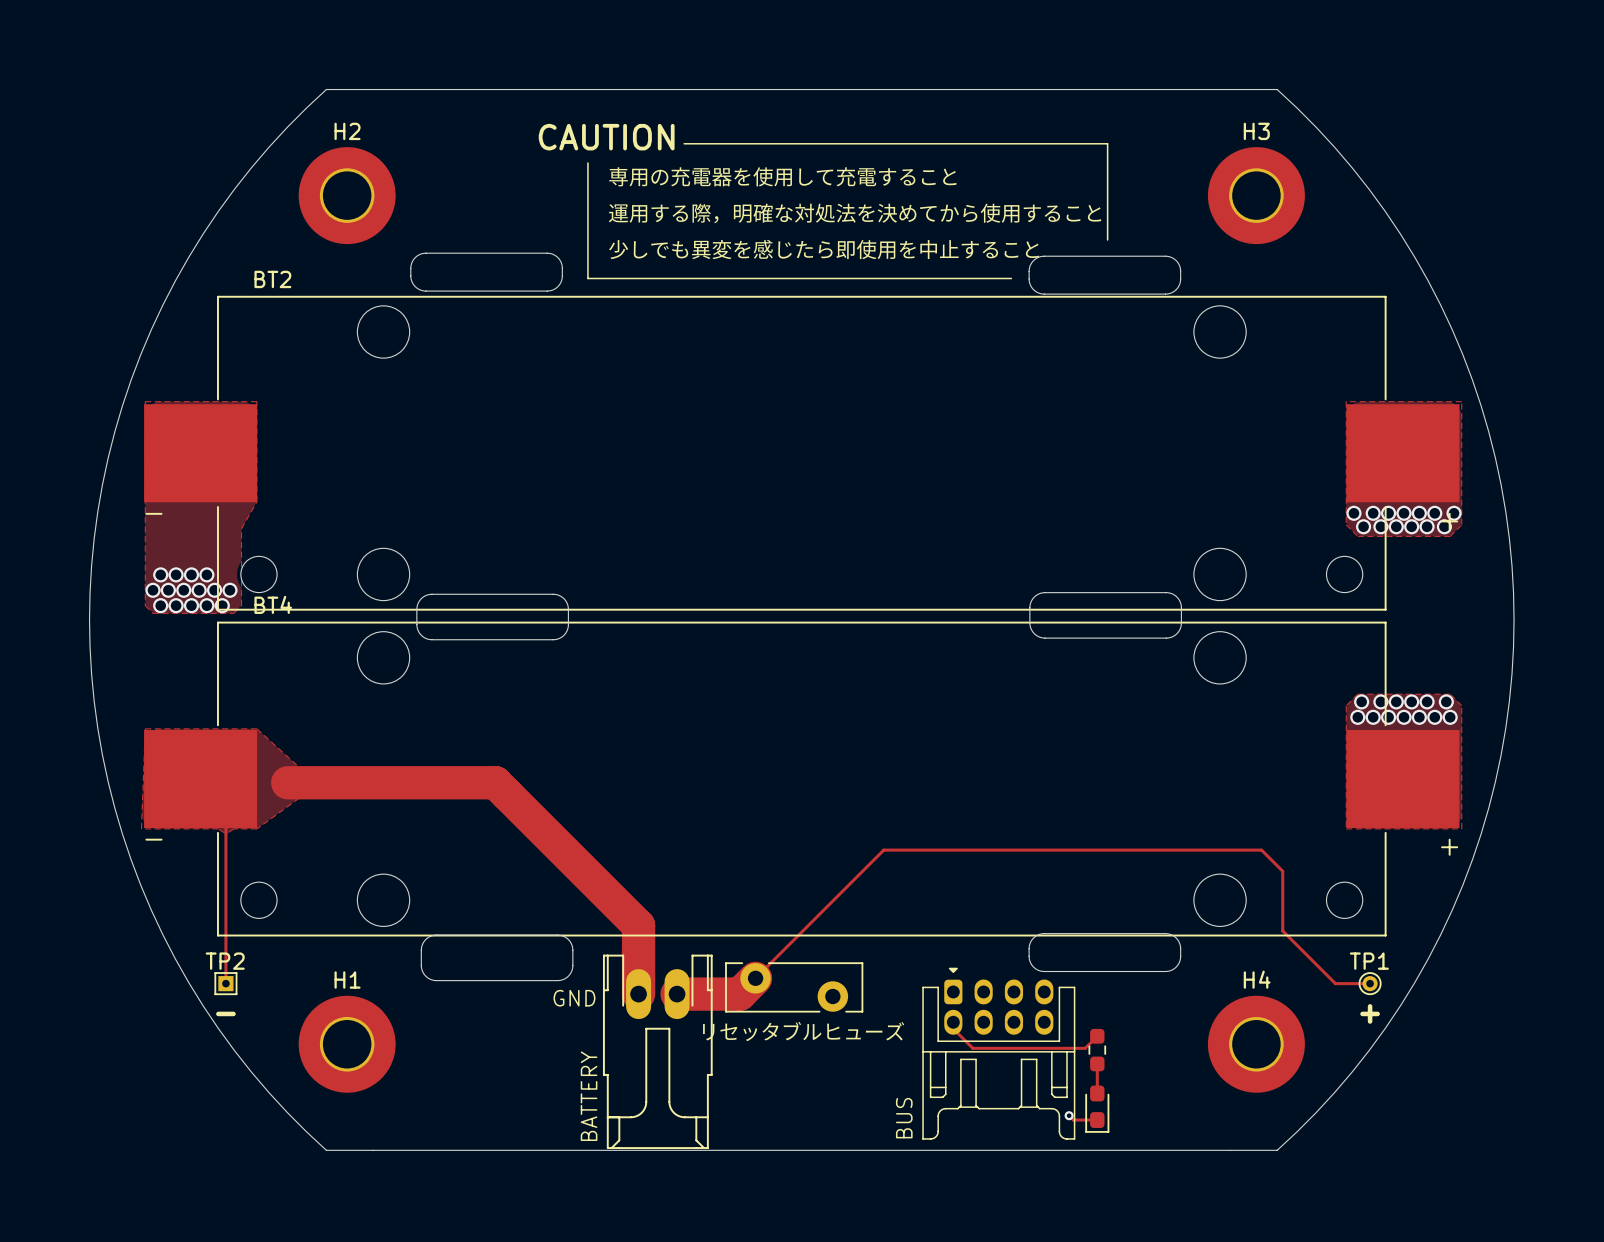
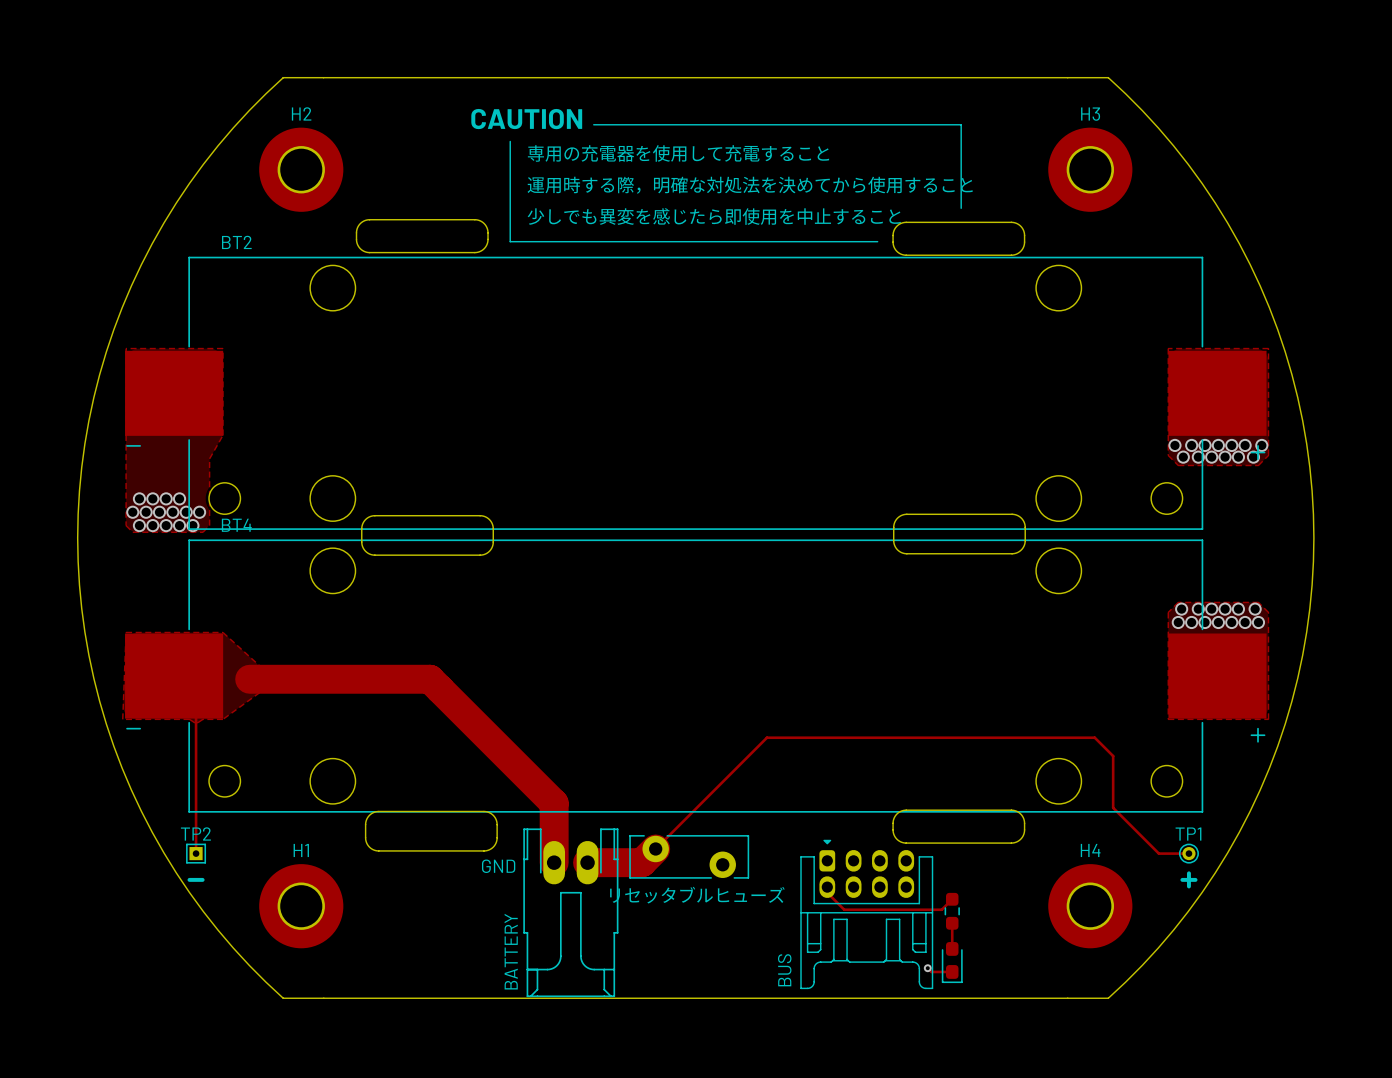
text: 運用する際，明確な対処法を決めてから使用すること (855, 213) -> 運用時する際，明確な対処法を決めてから使用すること (750, 185)

